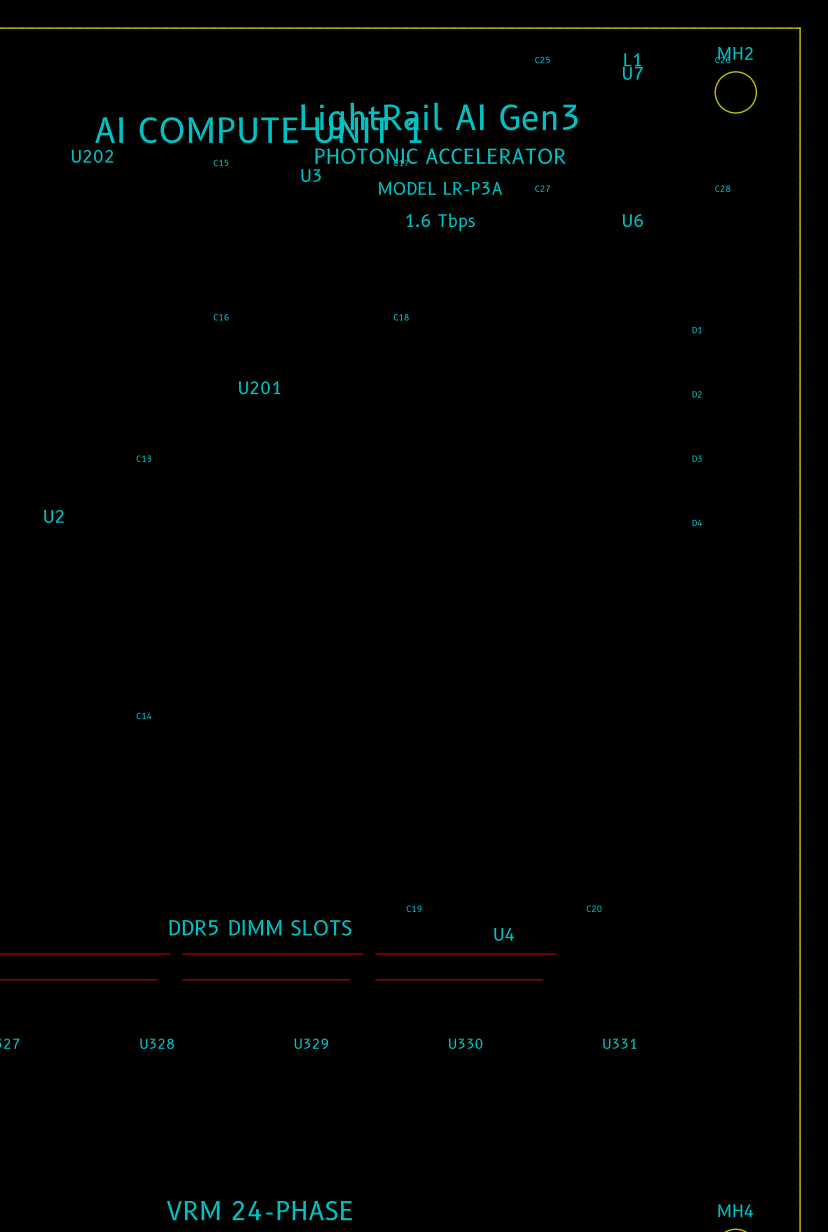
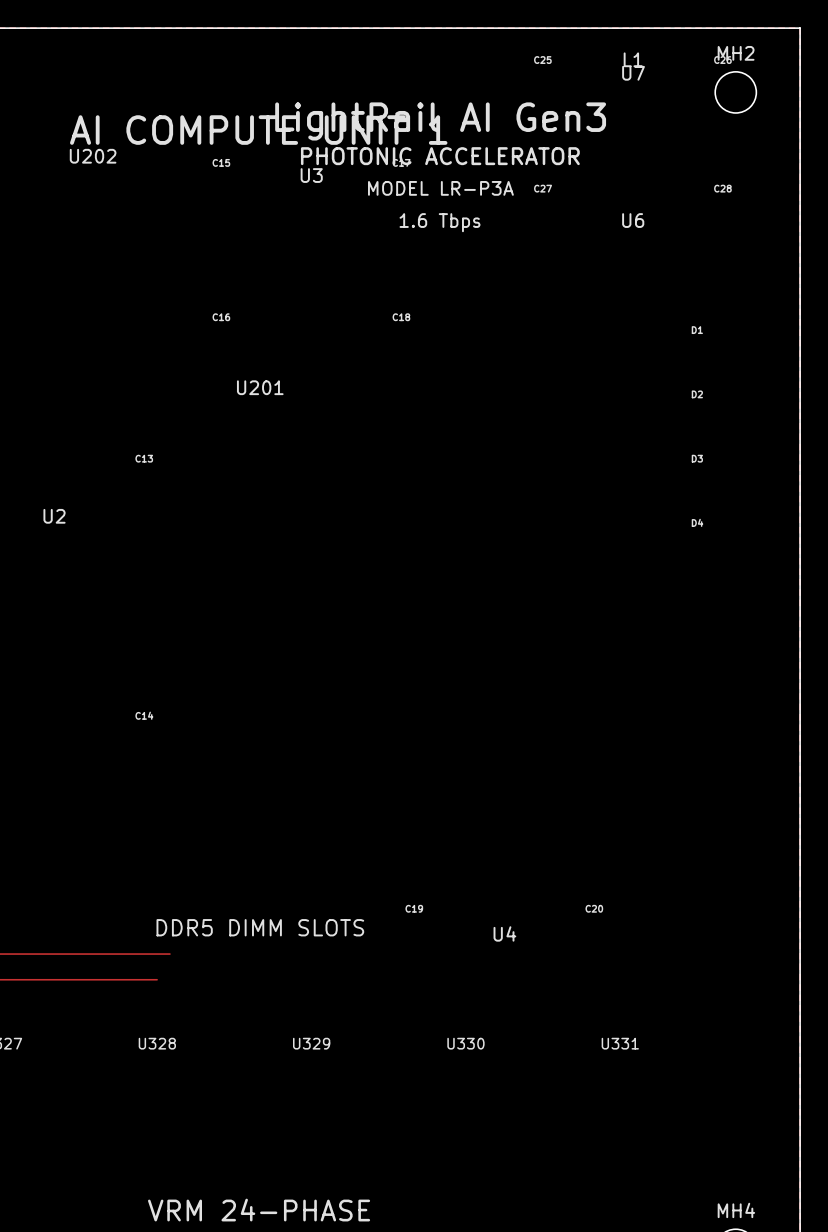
track: (182, 954) (362, 954) -> none
track: (375, 954) (555, 954) -> none
track: (182, 979) (349, 979) -> none
track: (375, 979) (542, 979) -> none

